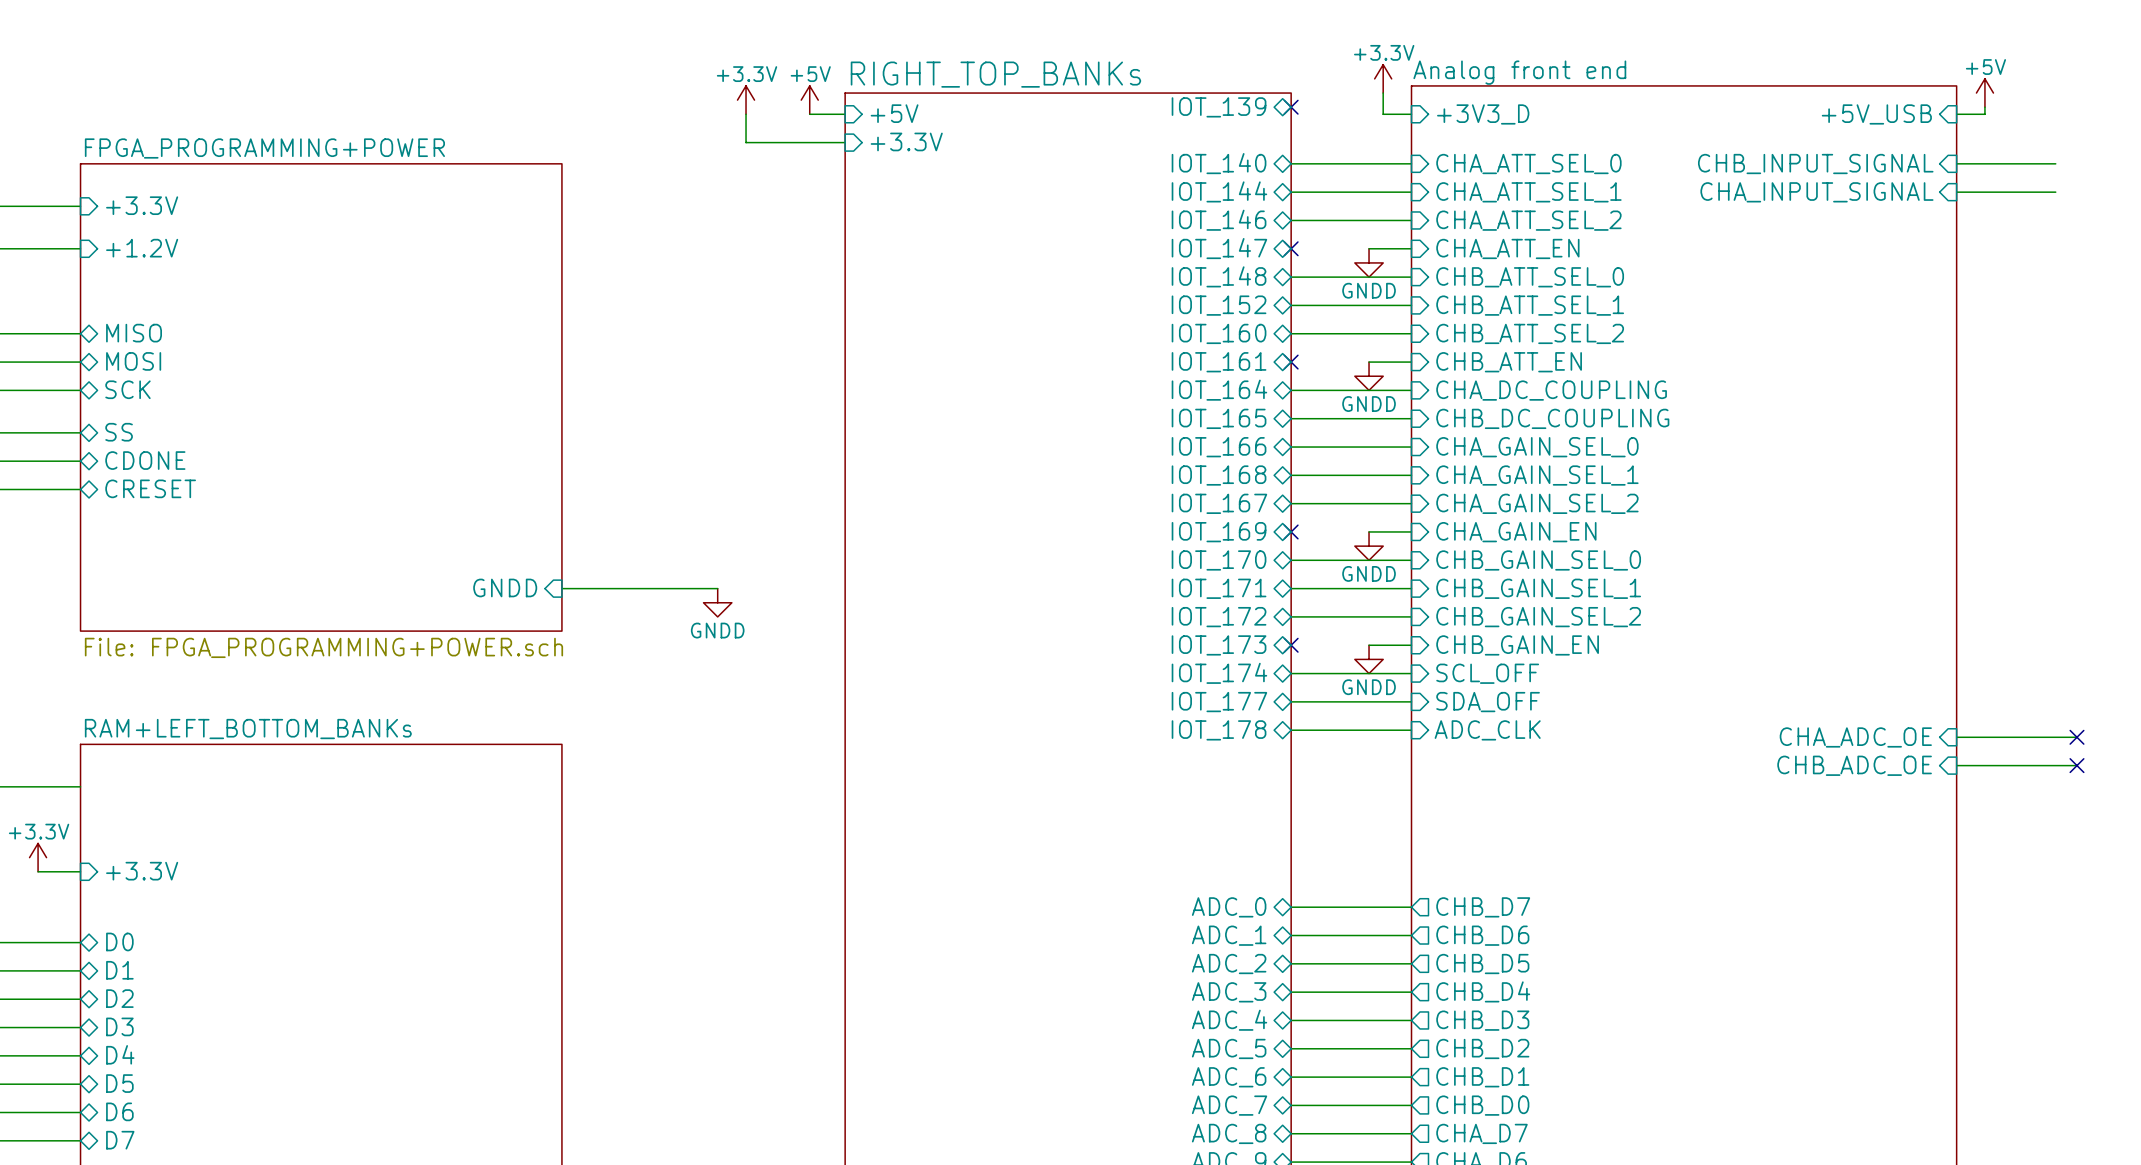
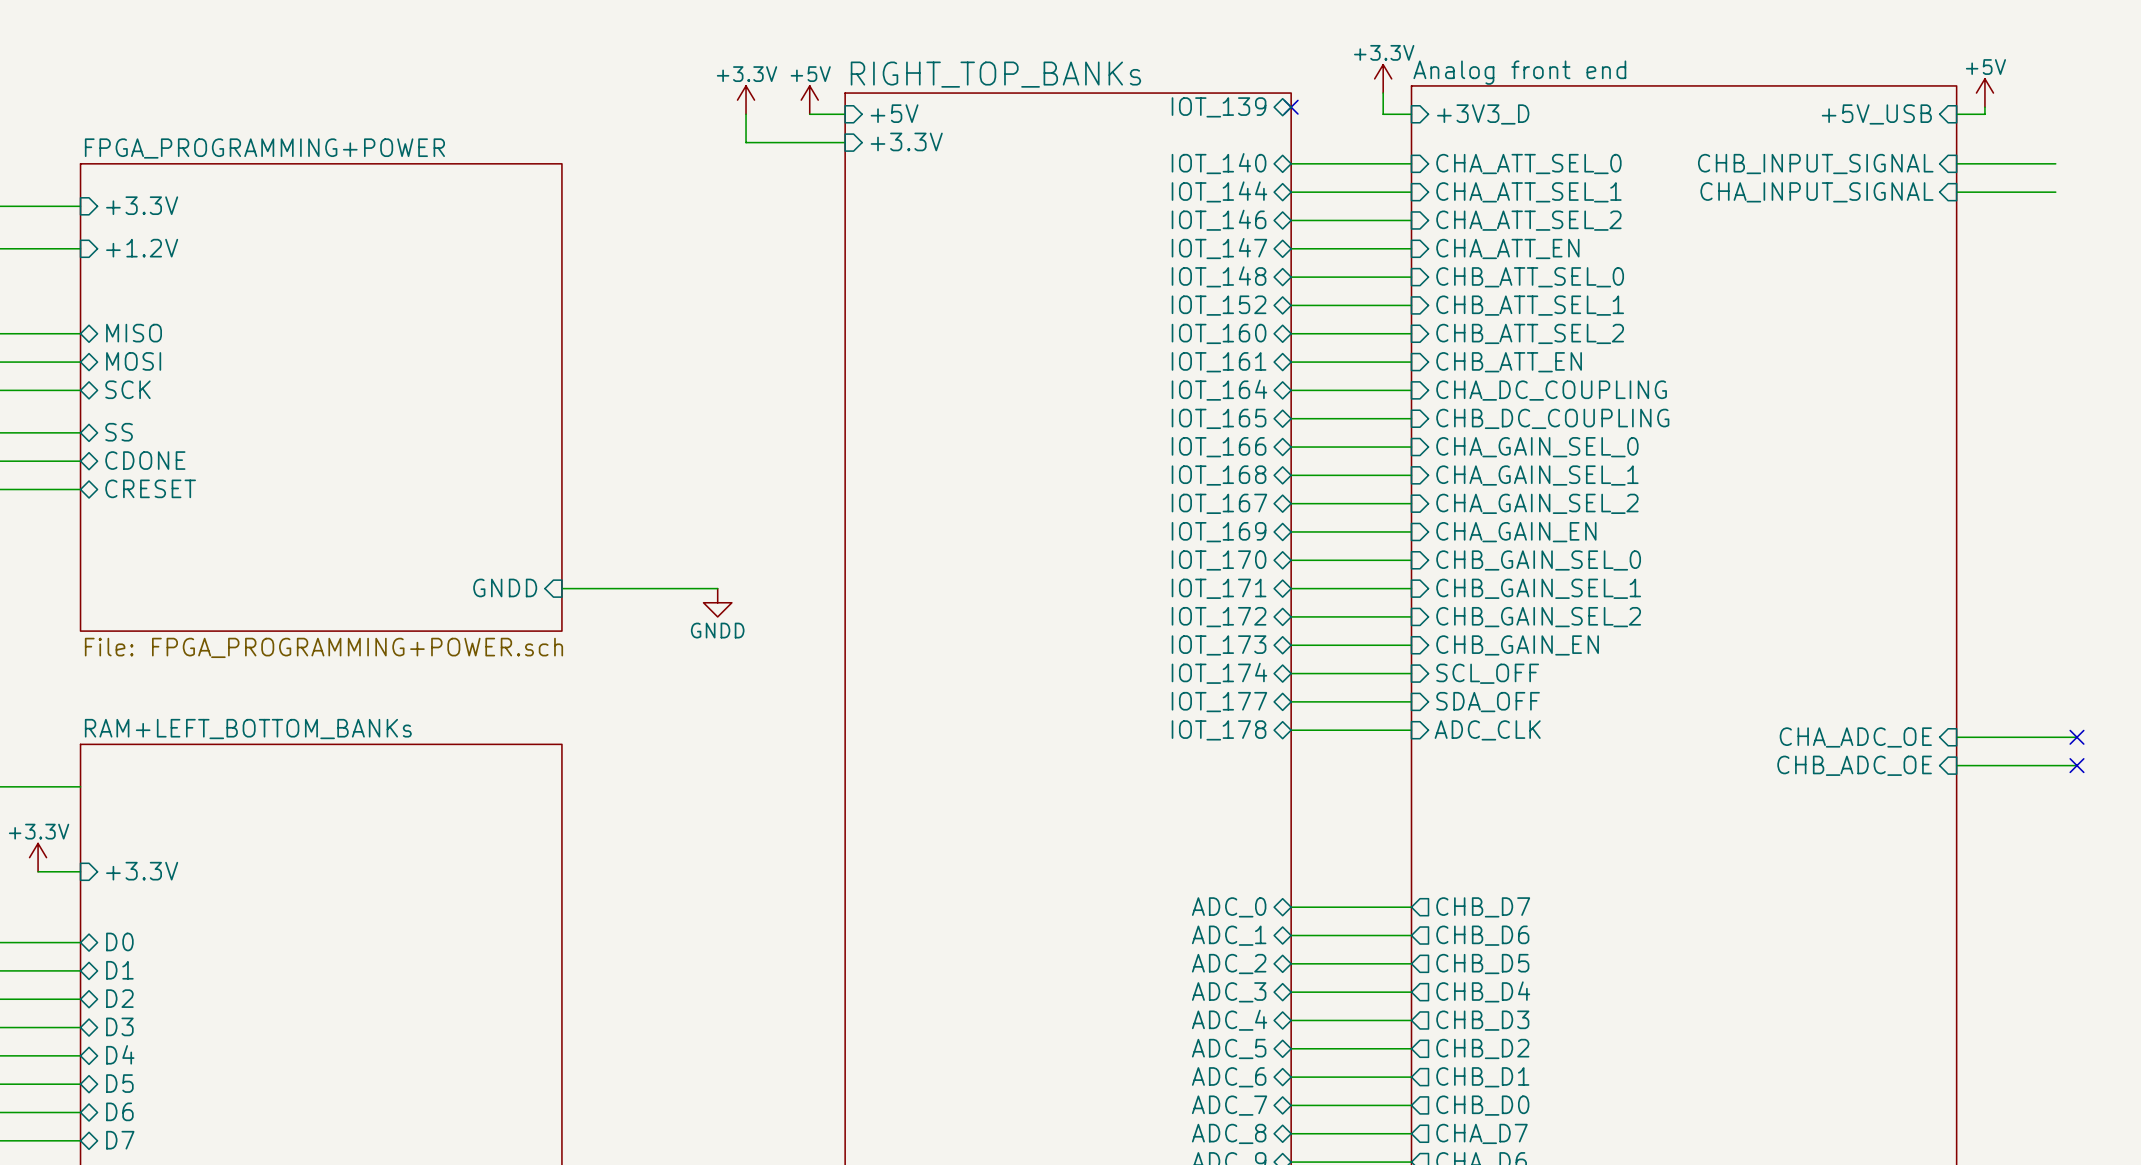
wire: none -> (1291, 248) (1369, 248)
no-connect mark: (1291, 248) -> none
power symbol: GNDD (1369, 262) -> none
wire: none -> (1291, 362) (1369, 362)
no-connect mark: (1291, 362) -> none
power symbol: GNDD (1369, 376) -> none
wire: none -> (1291, 531) (1369, 531)
no-connect mark: (1291, 531) -> none
power symbol: GNDD (1369, 546) -> none
wire: none -> (1291, 645) (1369, 645)
no-connect mark: (1291, 645) -> none
power symbol: GNDD (1369, 659) -> none

